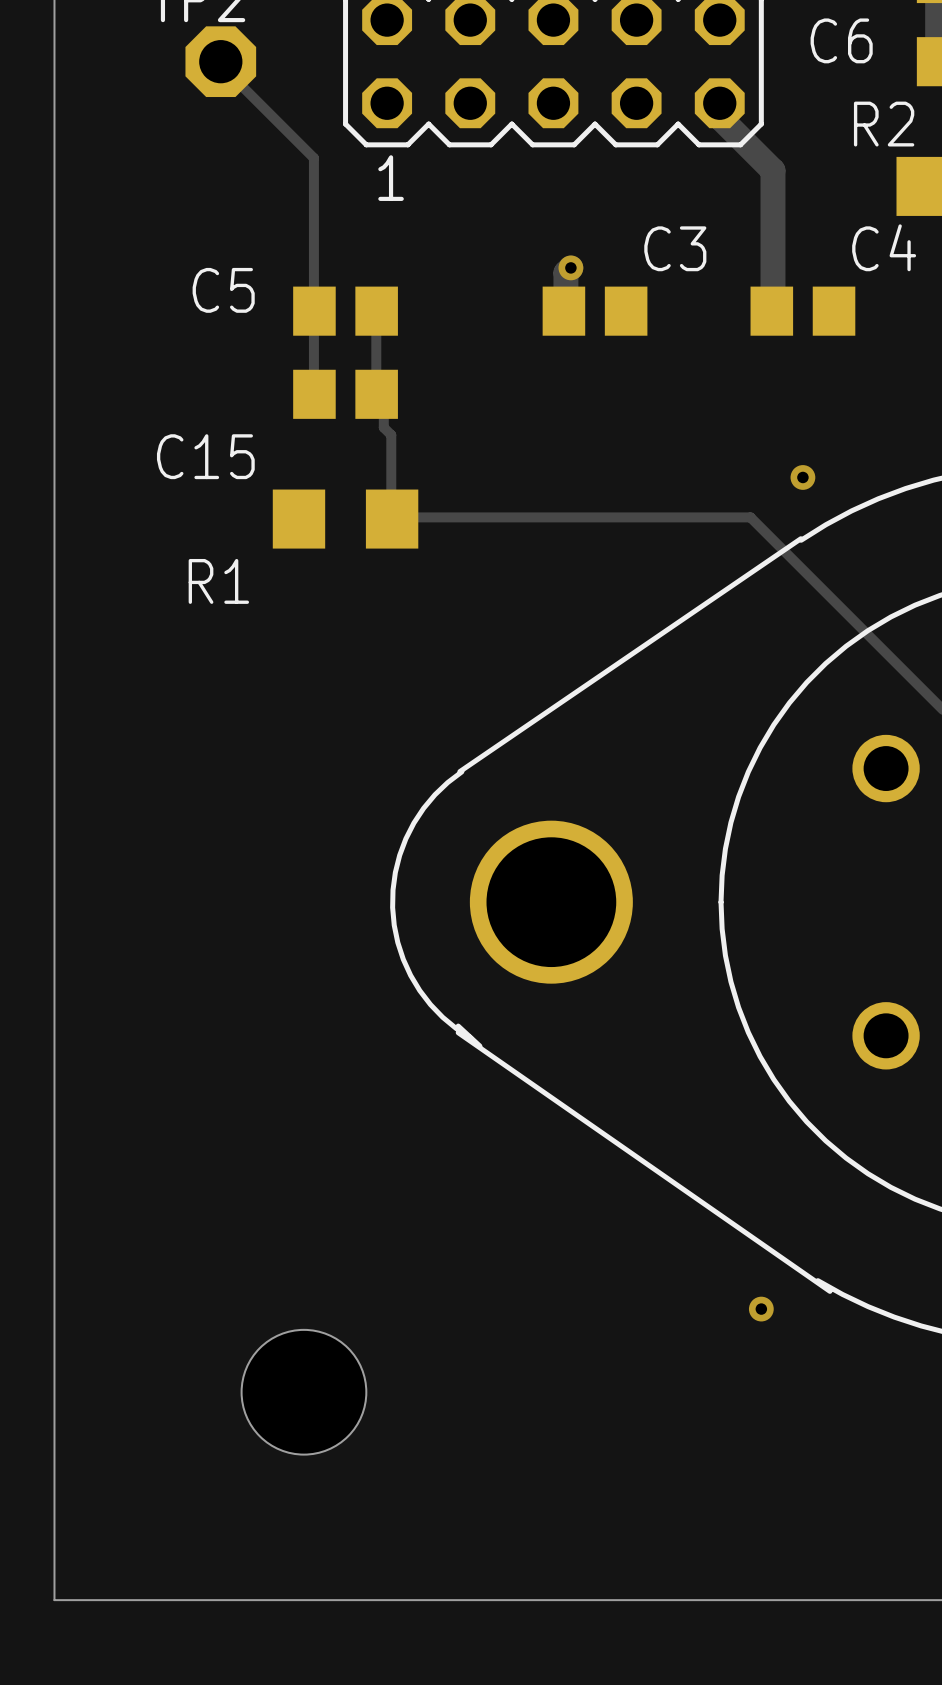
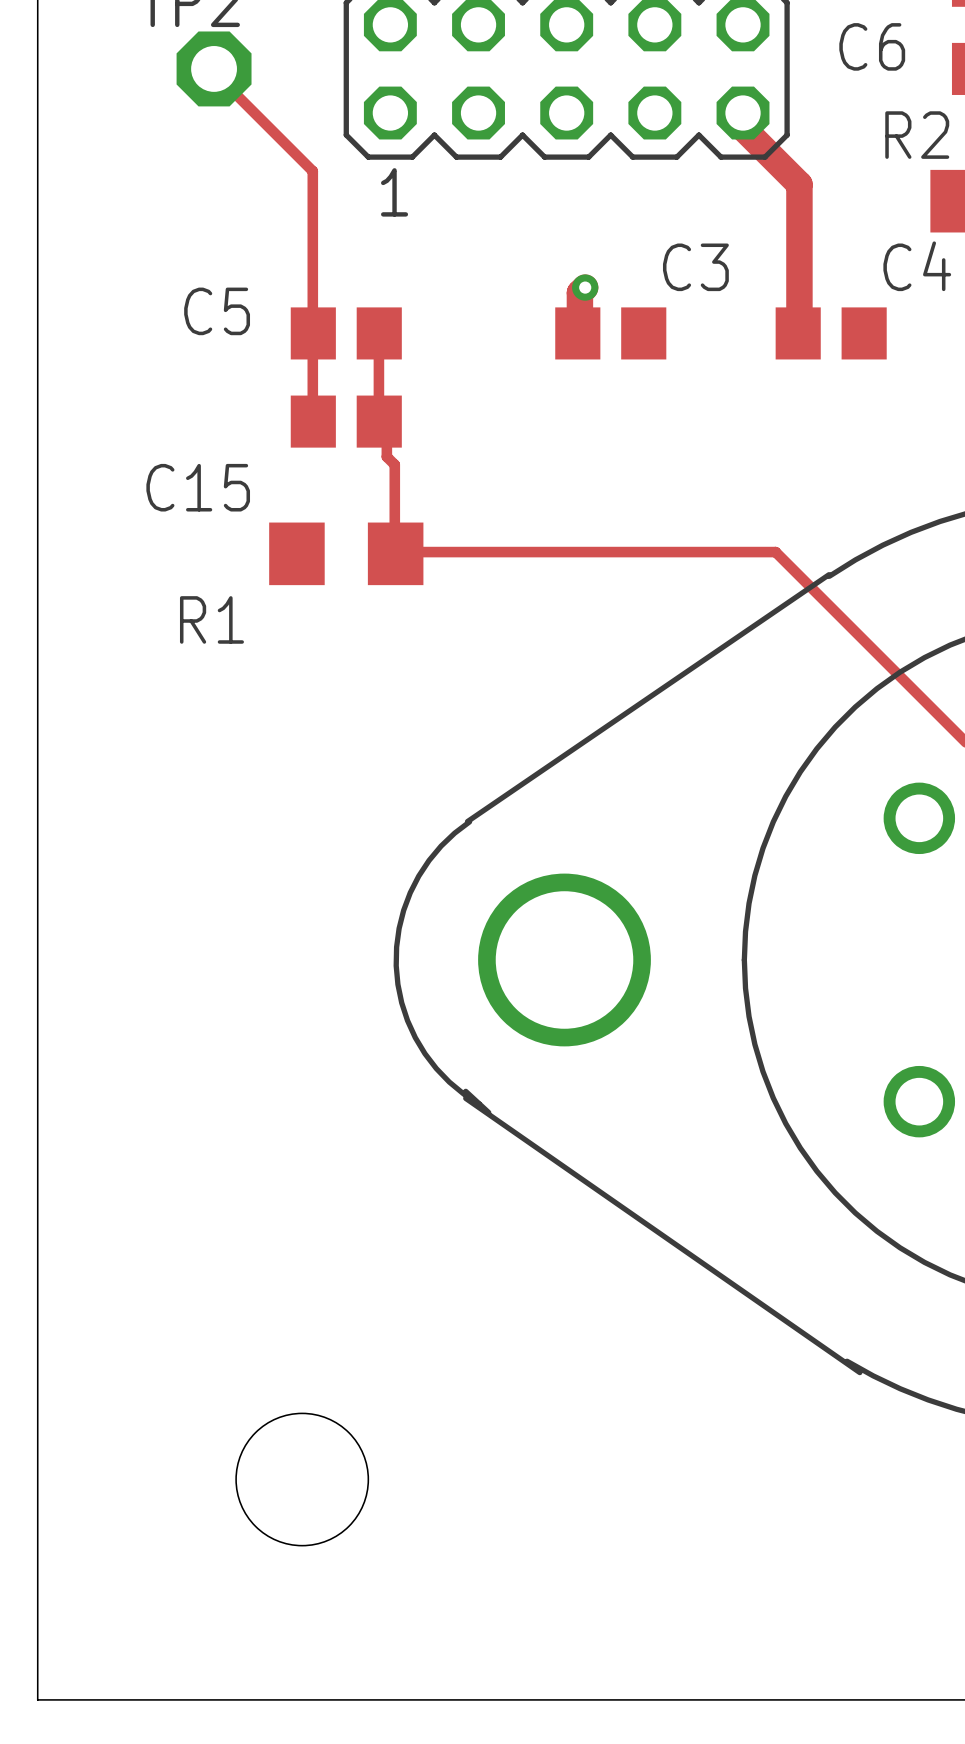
via: (802, 477) -> none
via: (761, 1309) -> none

